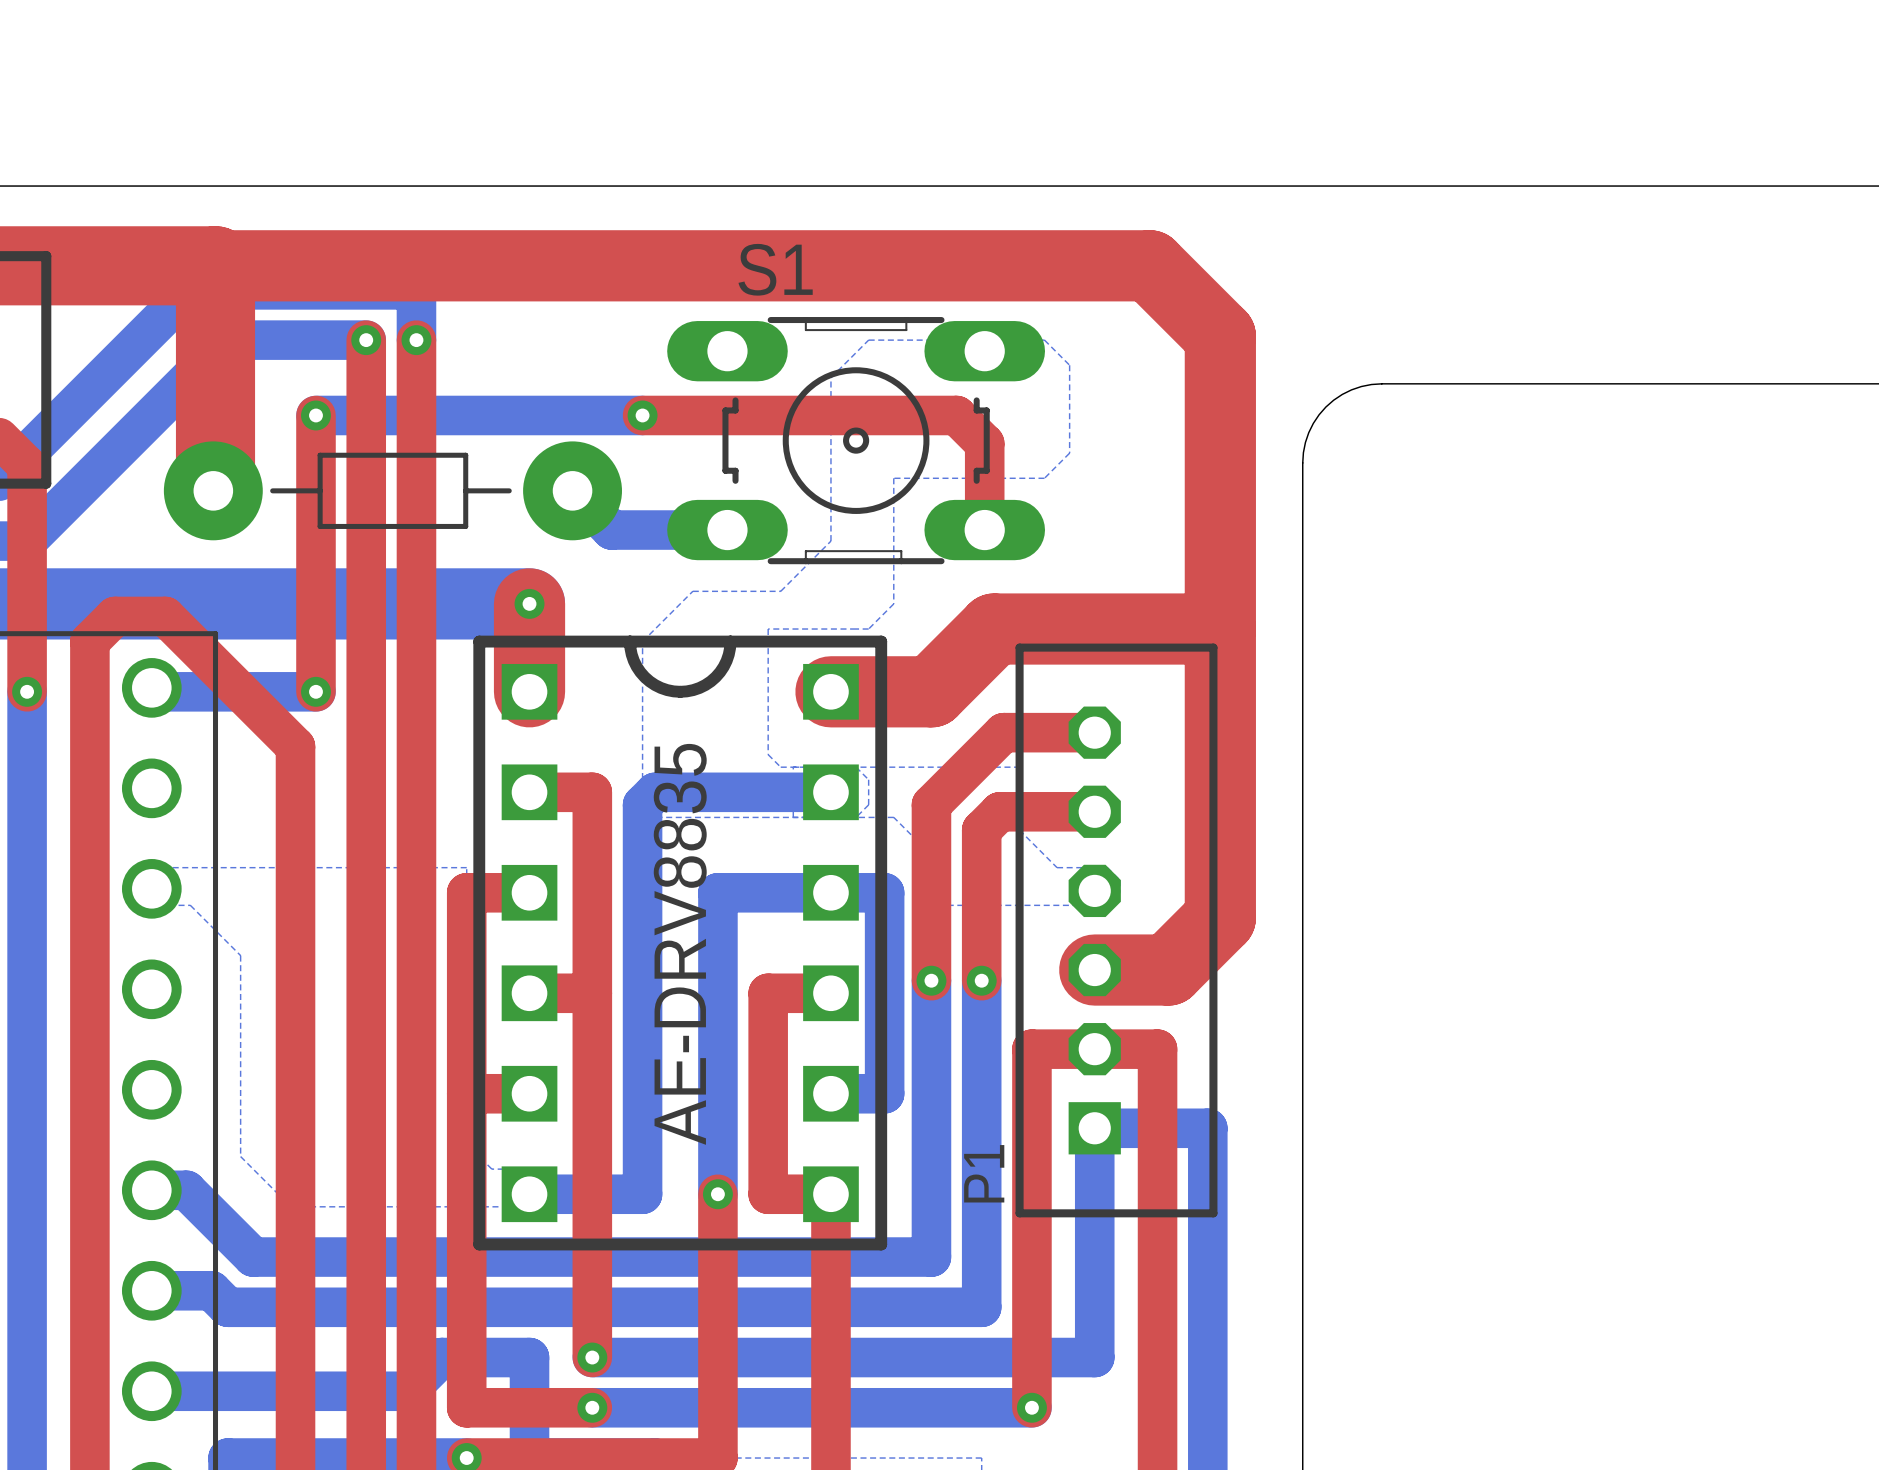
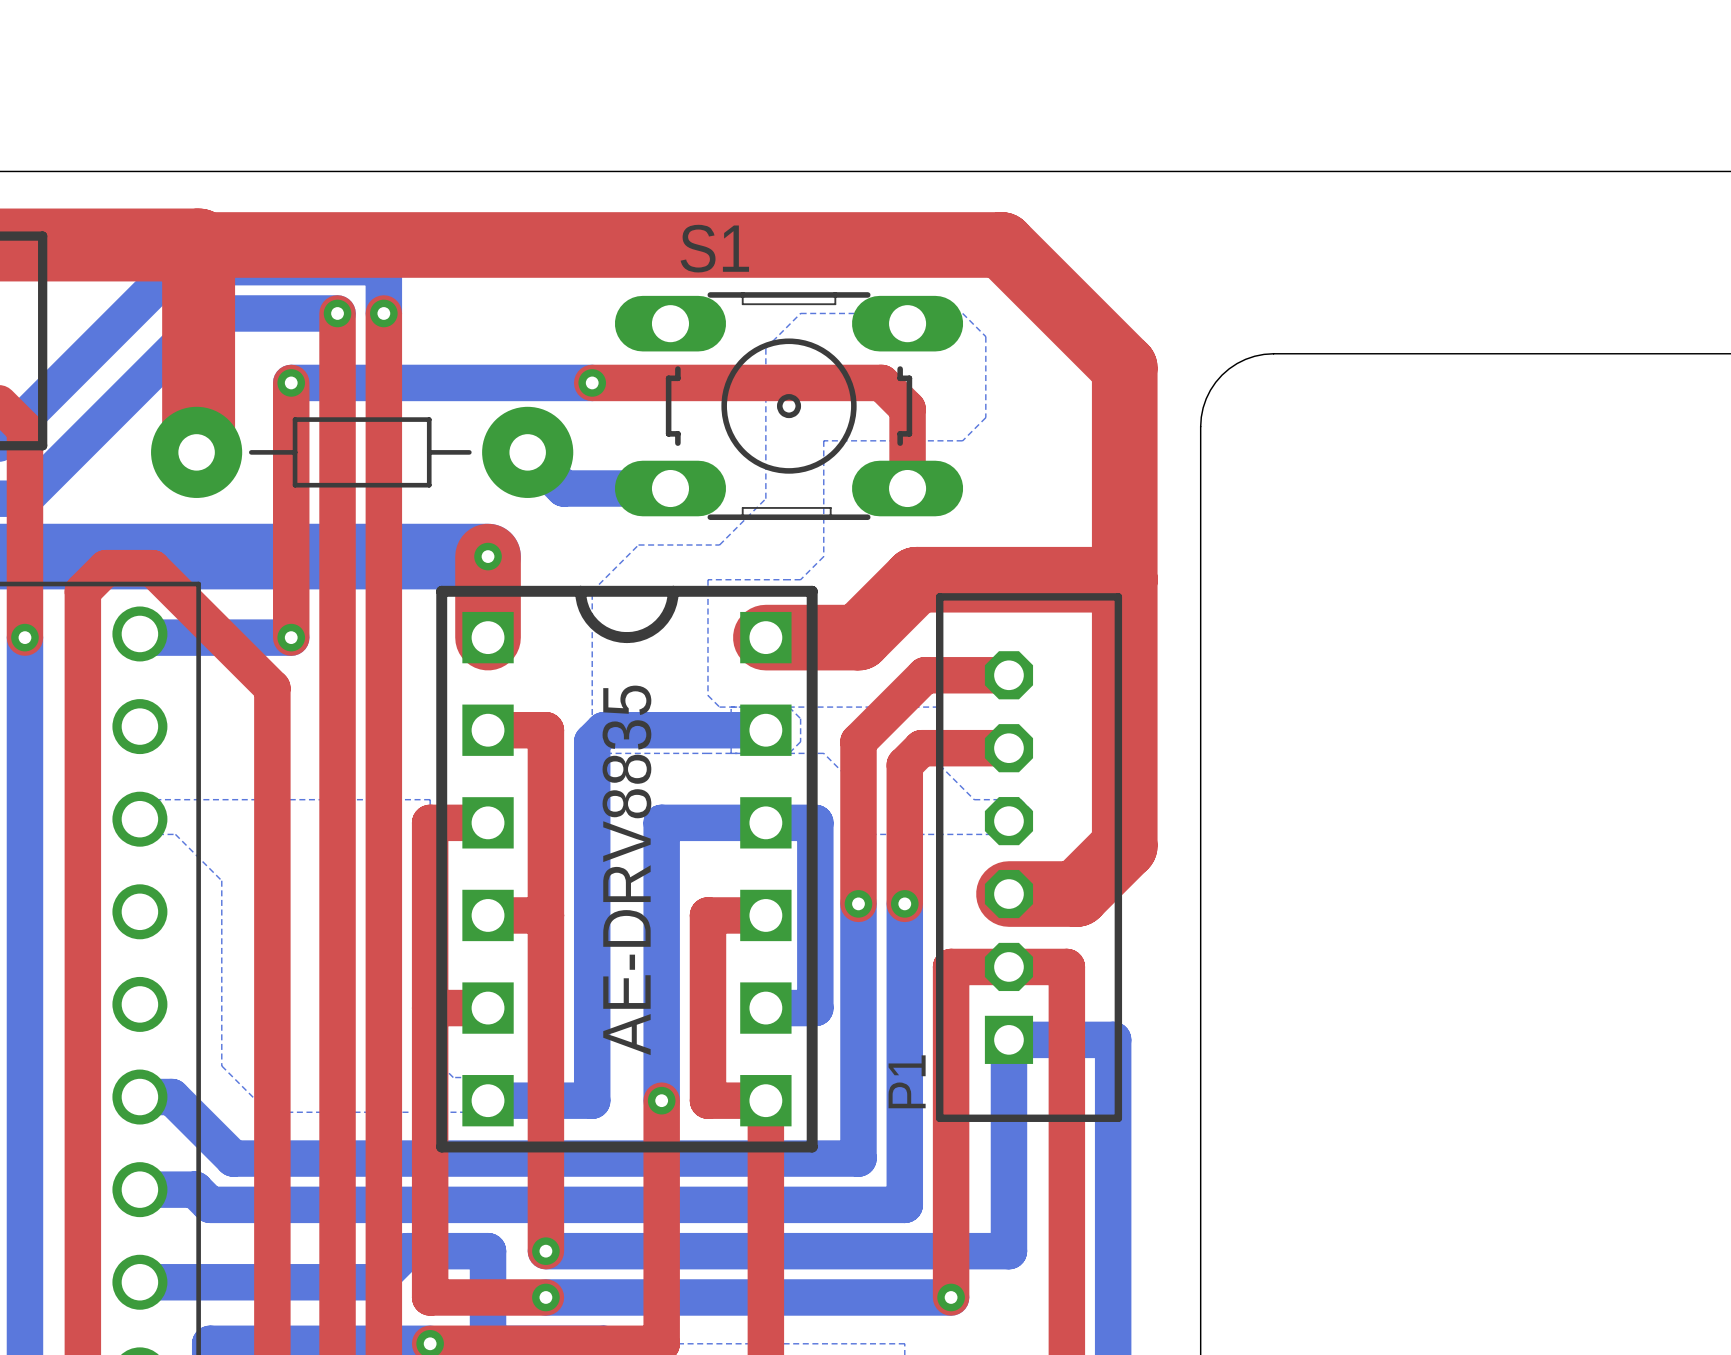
top track: (1087, 265) (1149, 265) (1220, 336) (1220, 399) -> (1001, 244) (1124, 367)

